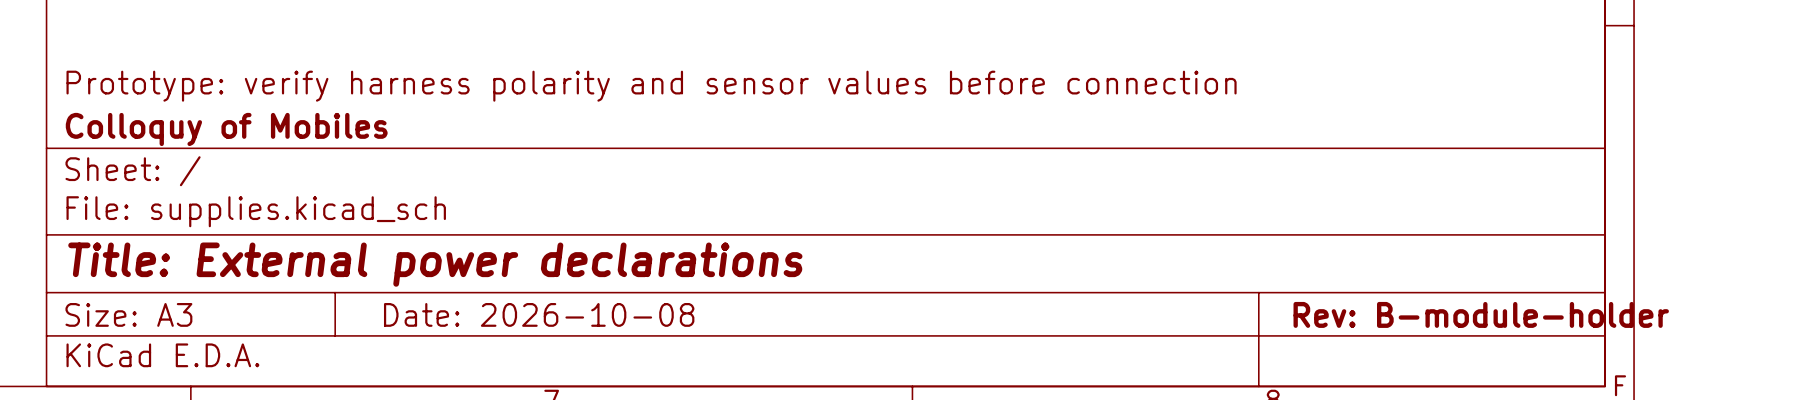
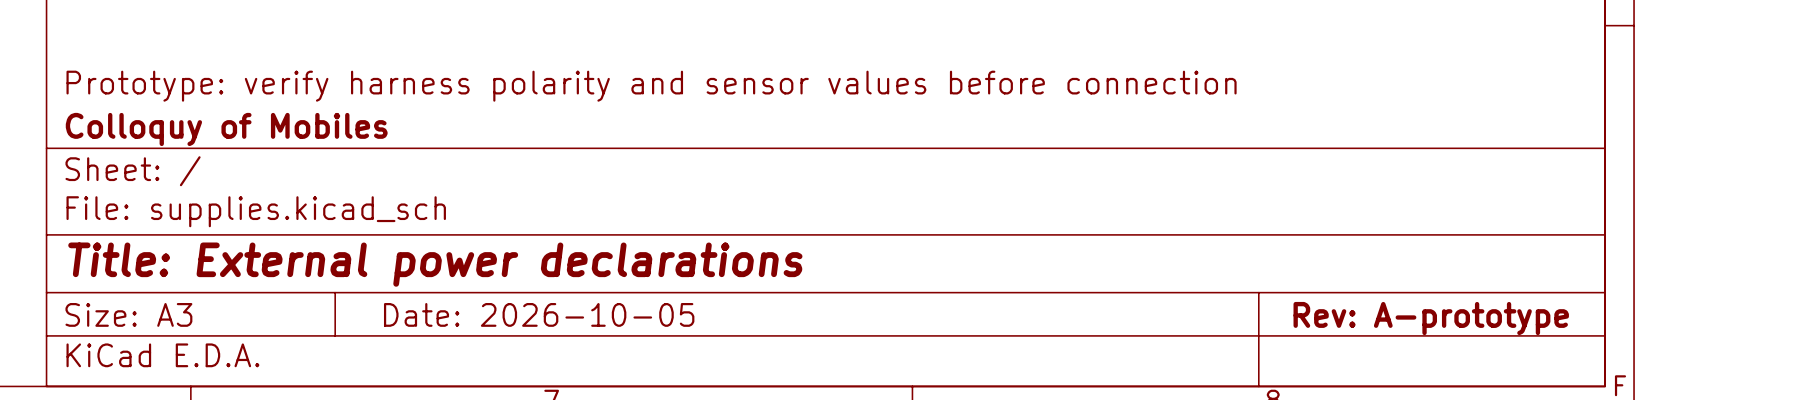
title block: Date: 2026-10-08 (539, 314) -> Date: 2026-10-05 (539, 314)
title block: Rev: B-module-holder (1481, 314) -> Rev: A-prototype (1431, 318)

